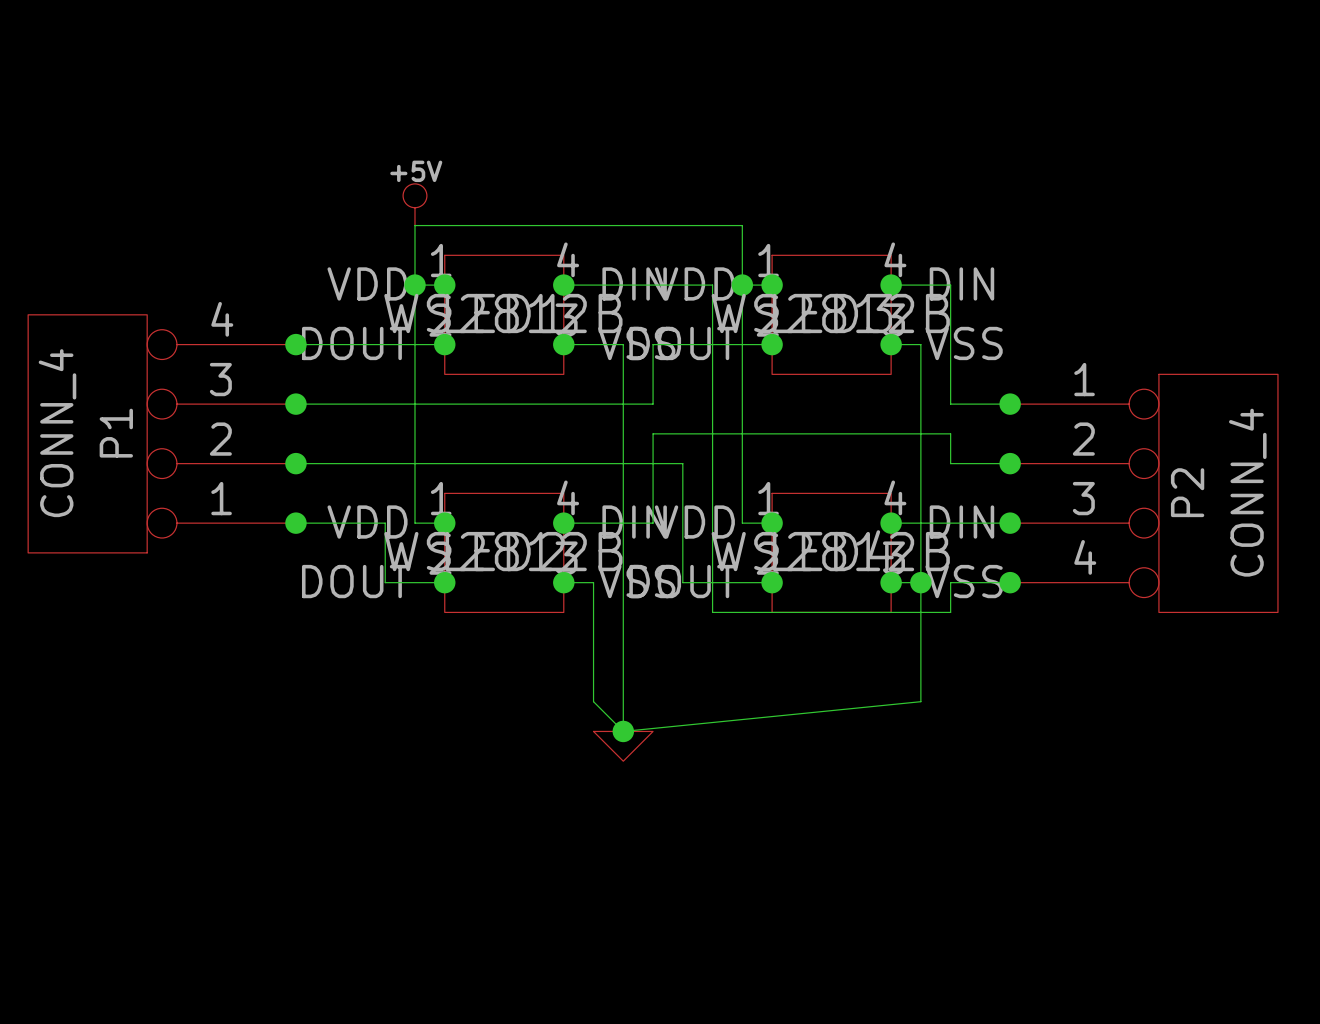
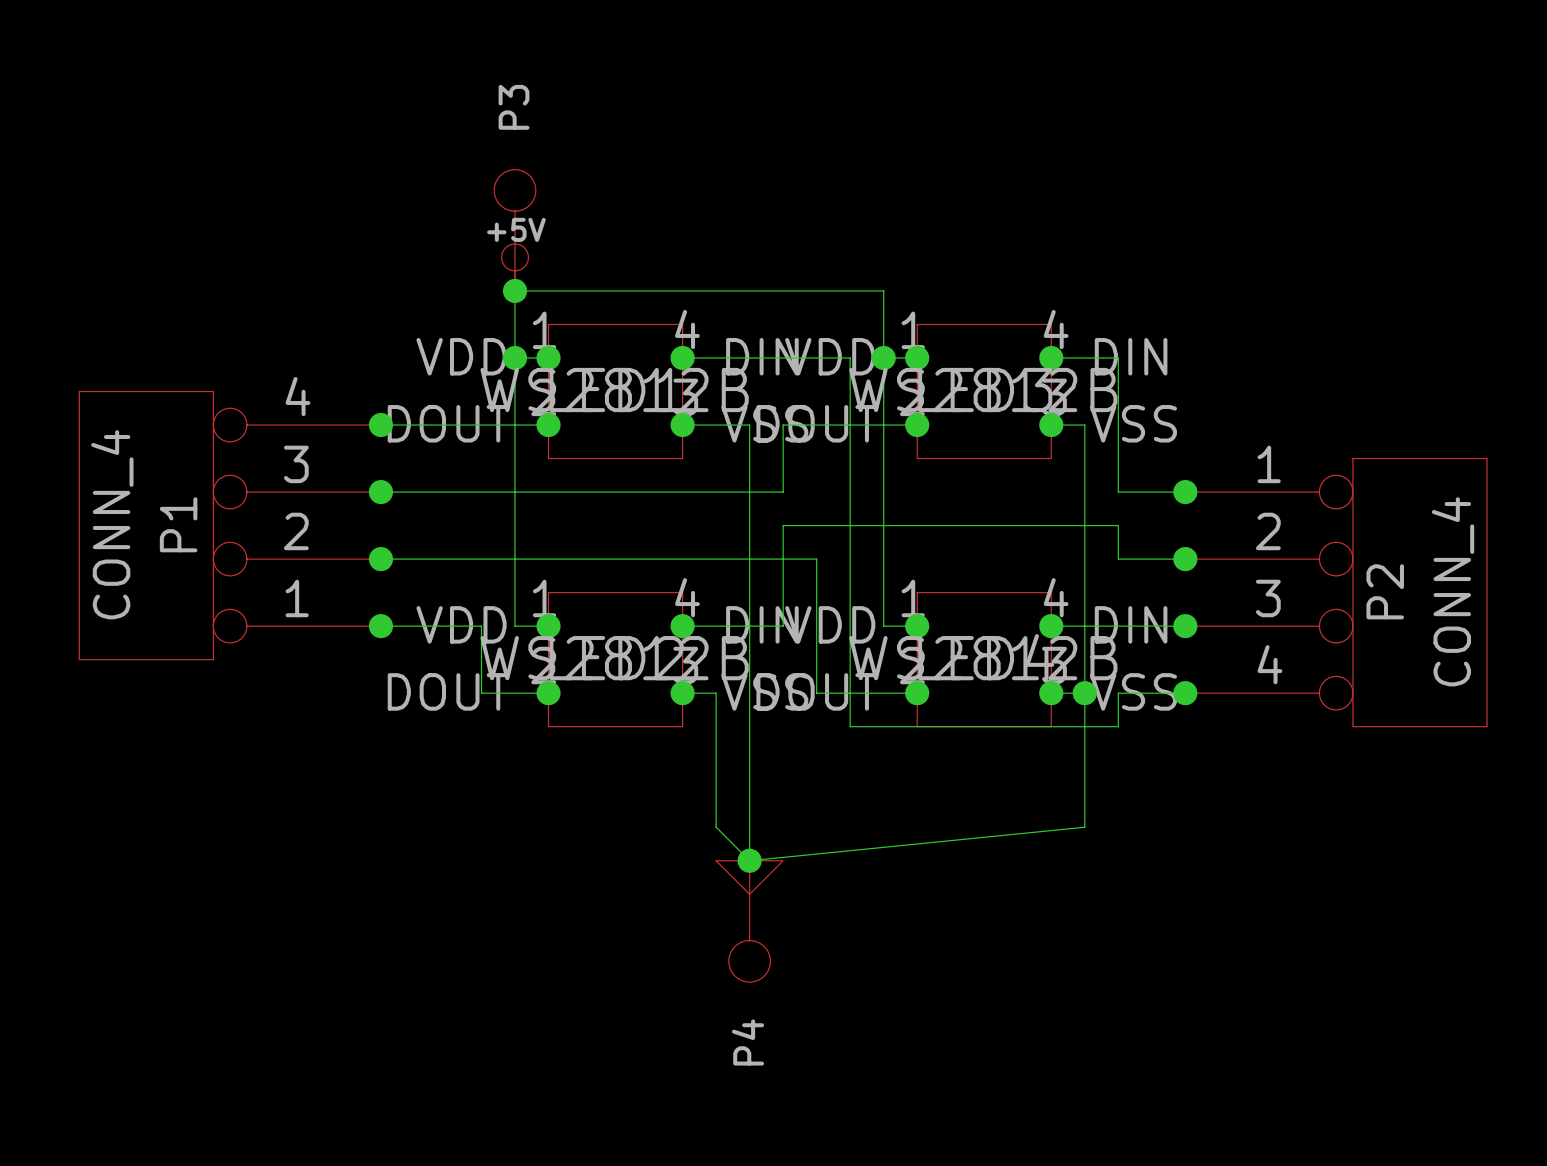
P3: none -> (515, 230)
junction: none -> (515, 290)
P4: none -> (749, 921)

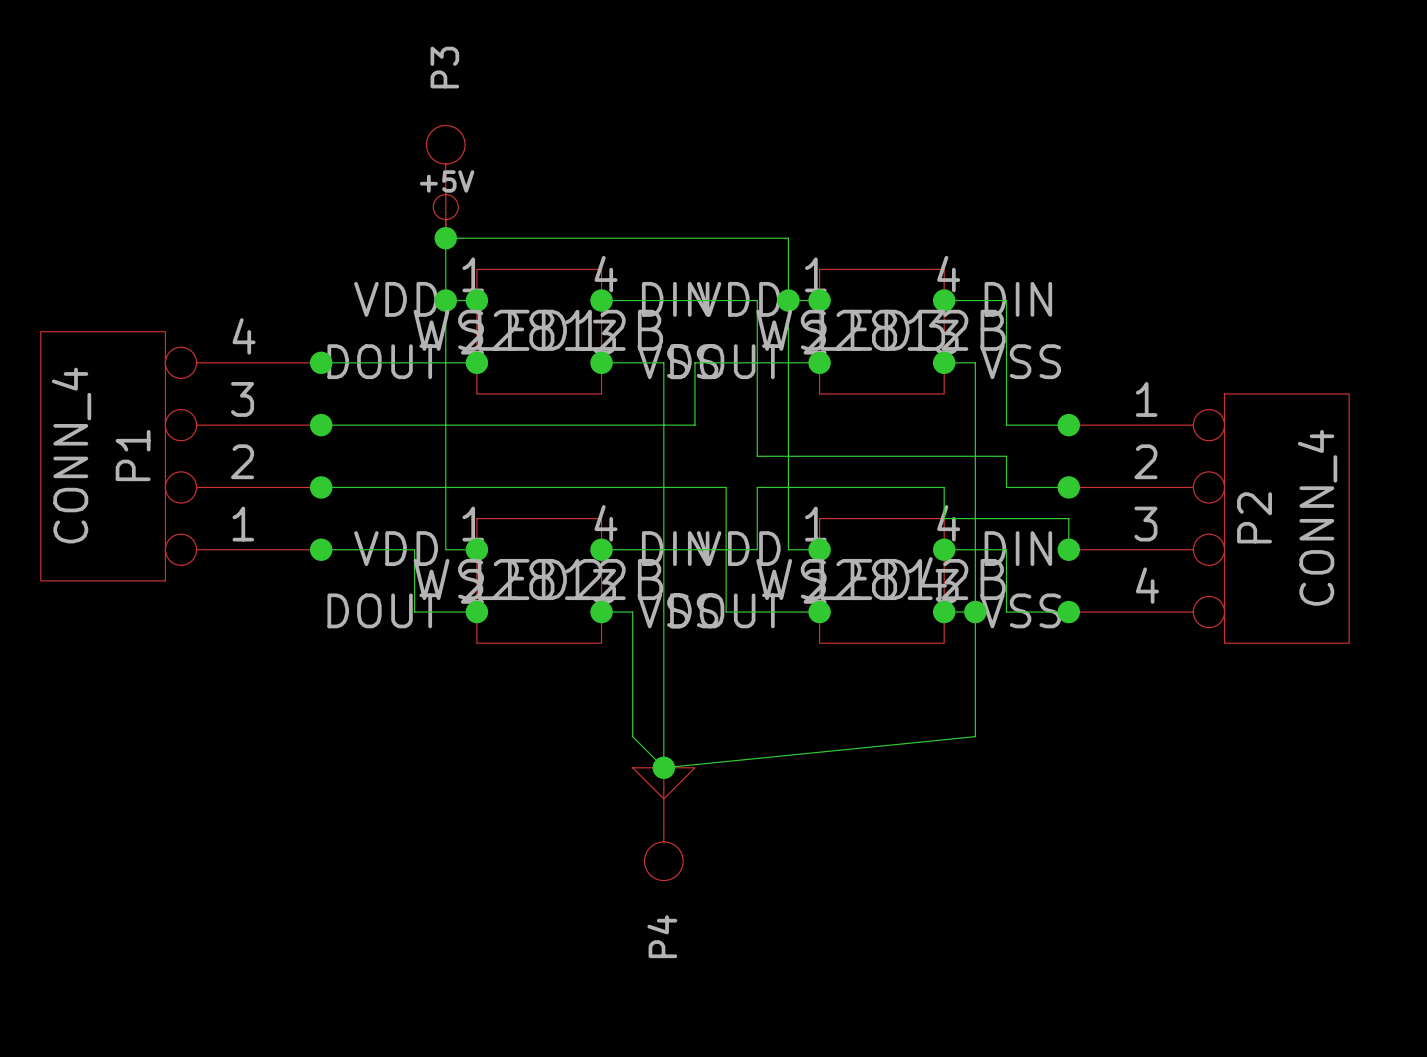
wire: (850, 559) (850, 525) (783, 525) (783, 626) -> (757, 549) (694, 549)
wire: none -> (757, 487) (944, 487) (944, 518) (1068, 518) (1068, 549)
wire: (850, 626) (850, 726) (1118, 726) (1118, 693) -> none
wire: (1118, 626) (1185, 626) -> (1006, 549) (1006, 612)

